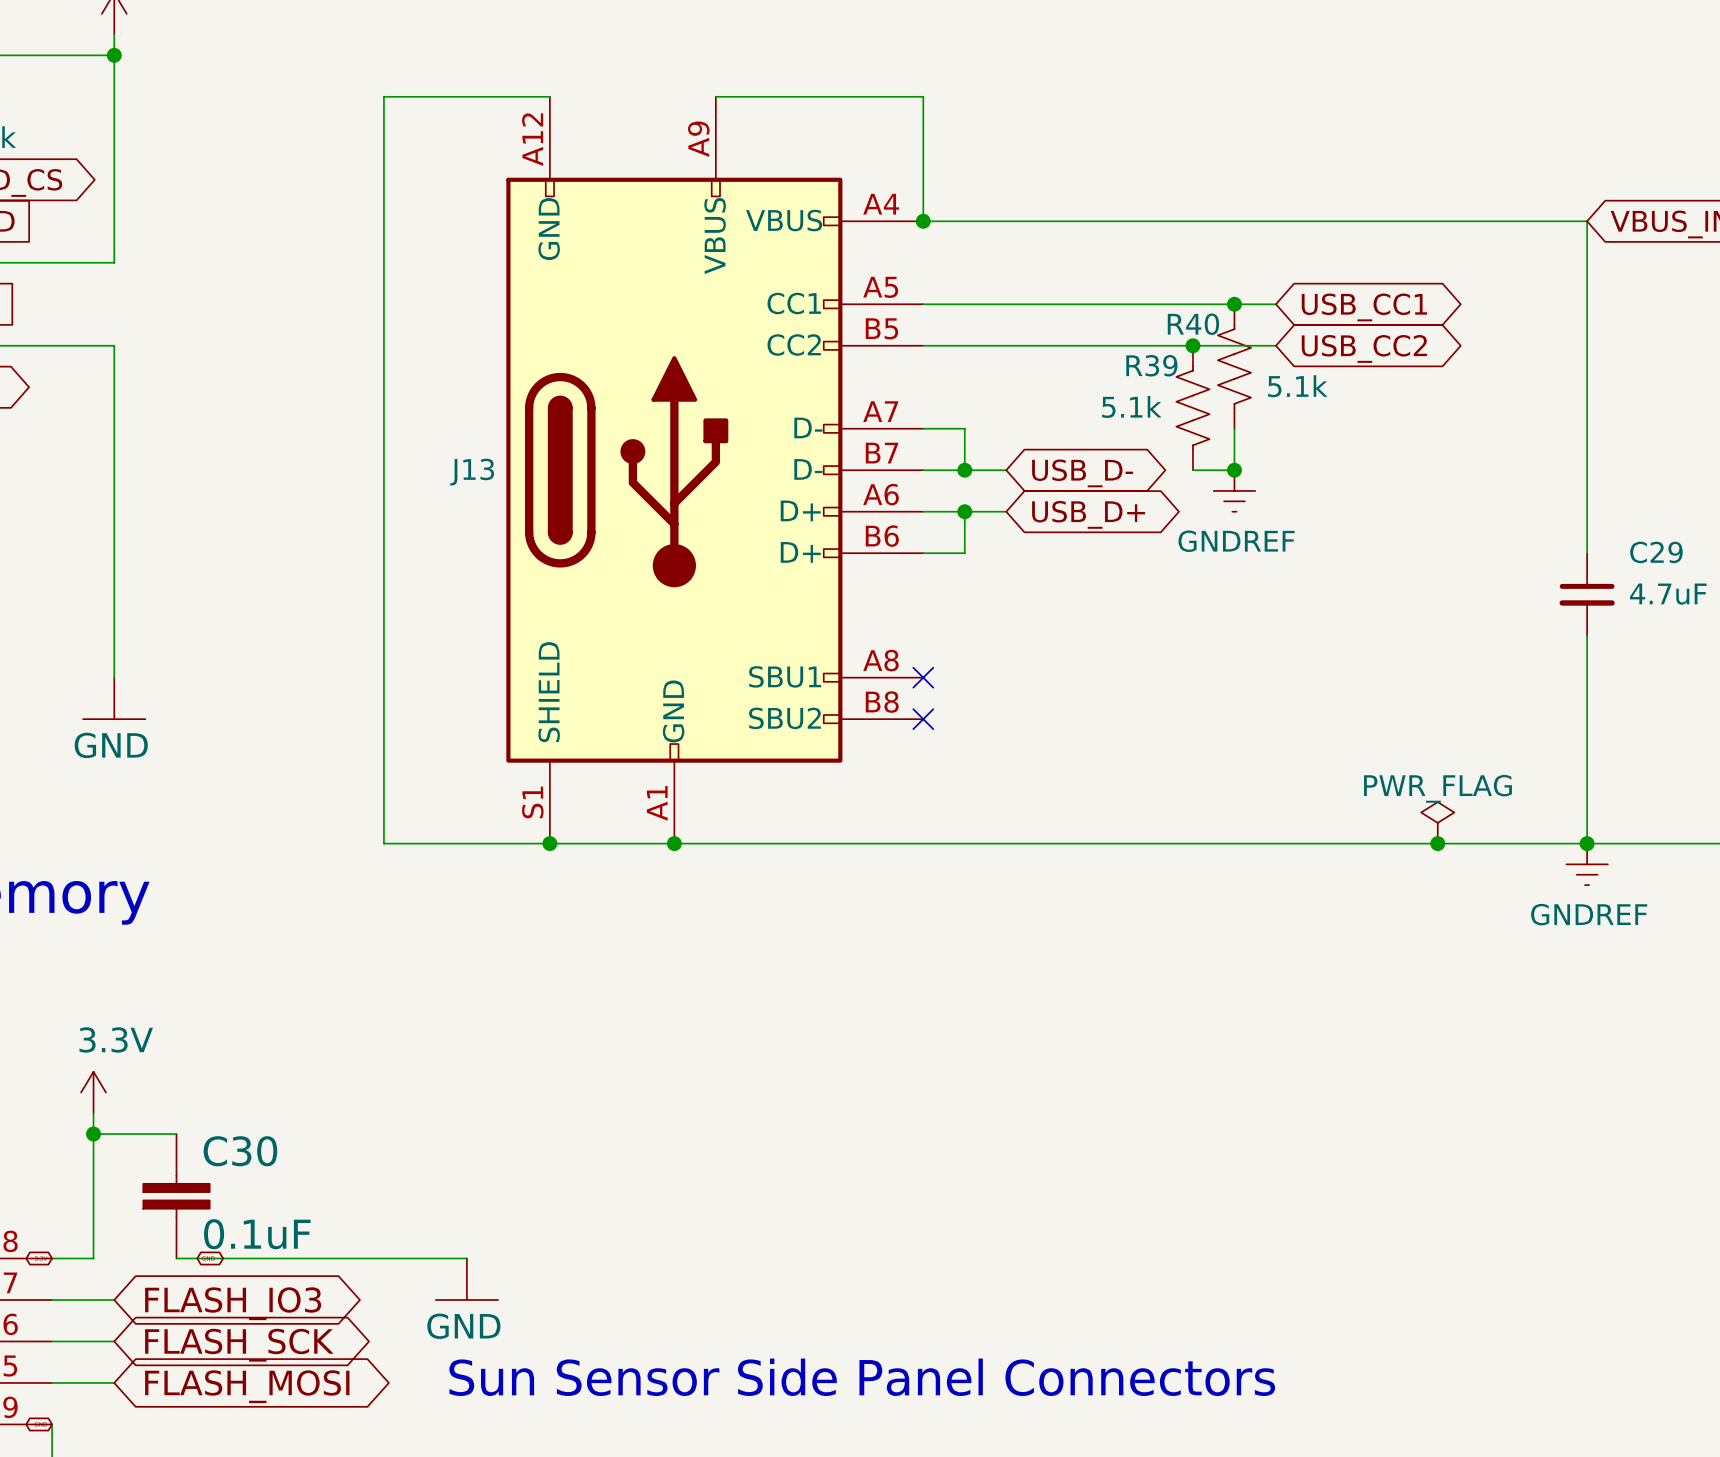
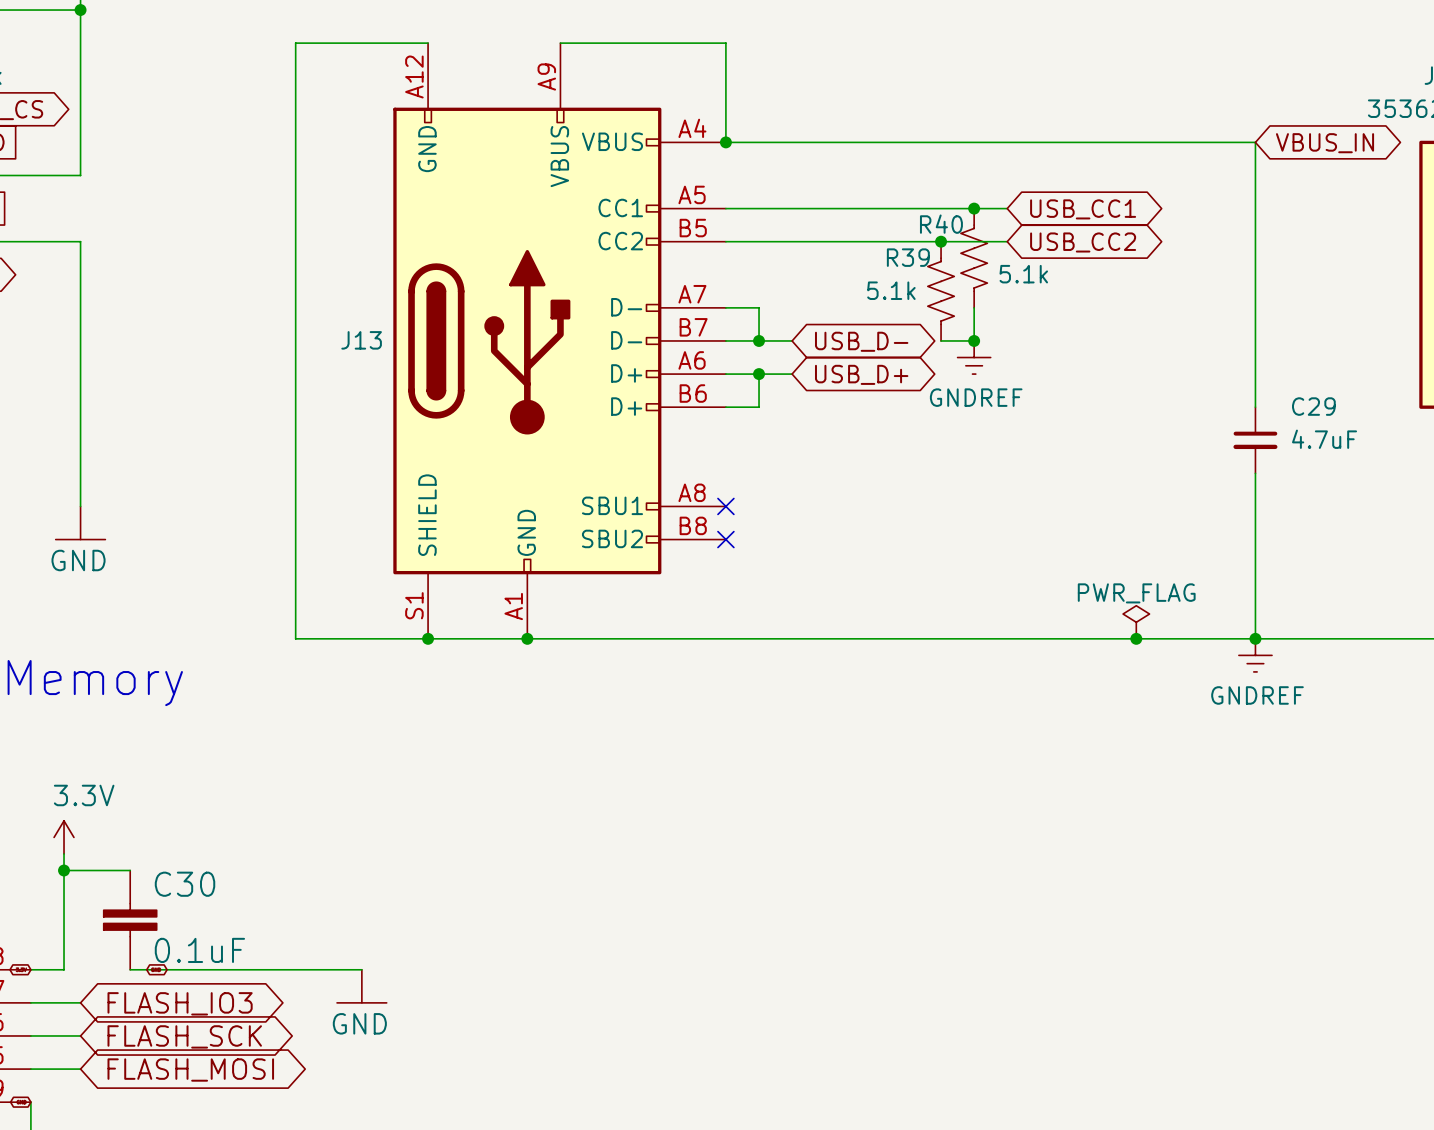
text: Sun Sensor Side Panel Connectors (862, 1377) -> none

